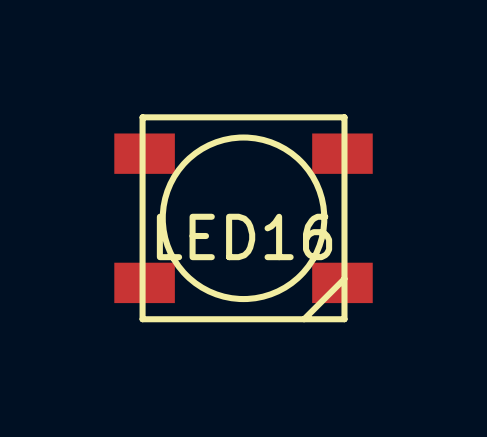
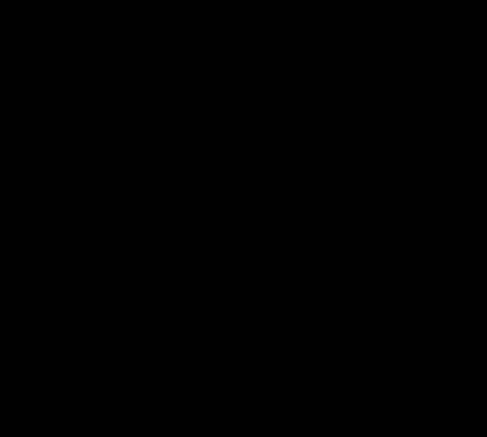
LED16: (243, 218) -> none

